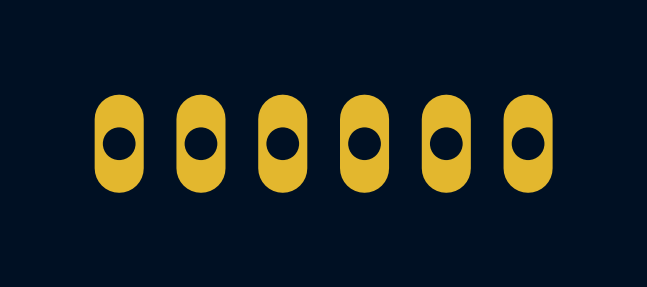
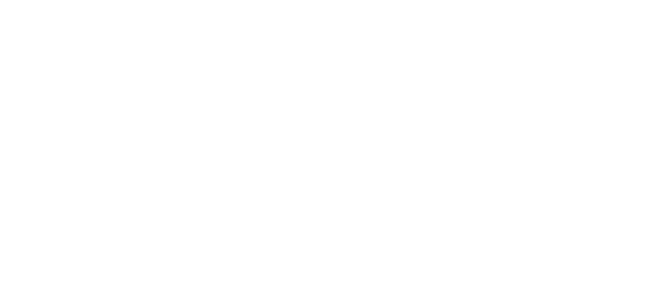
part: (323, 143) -> none

